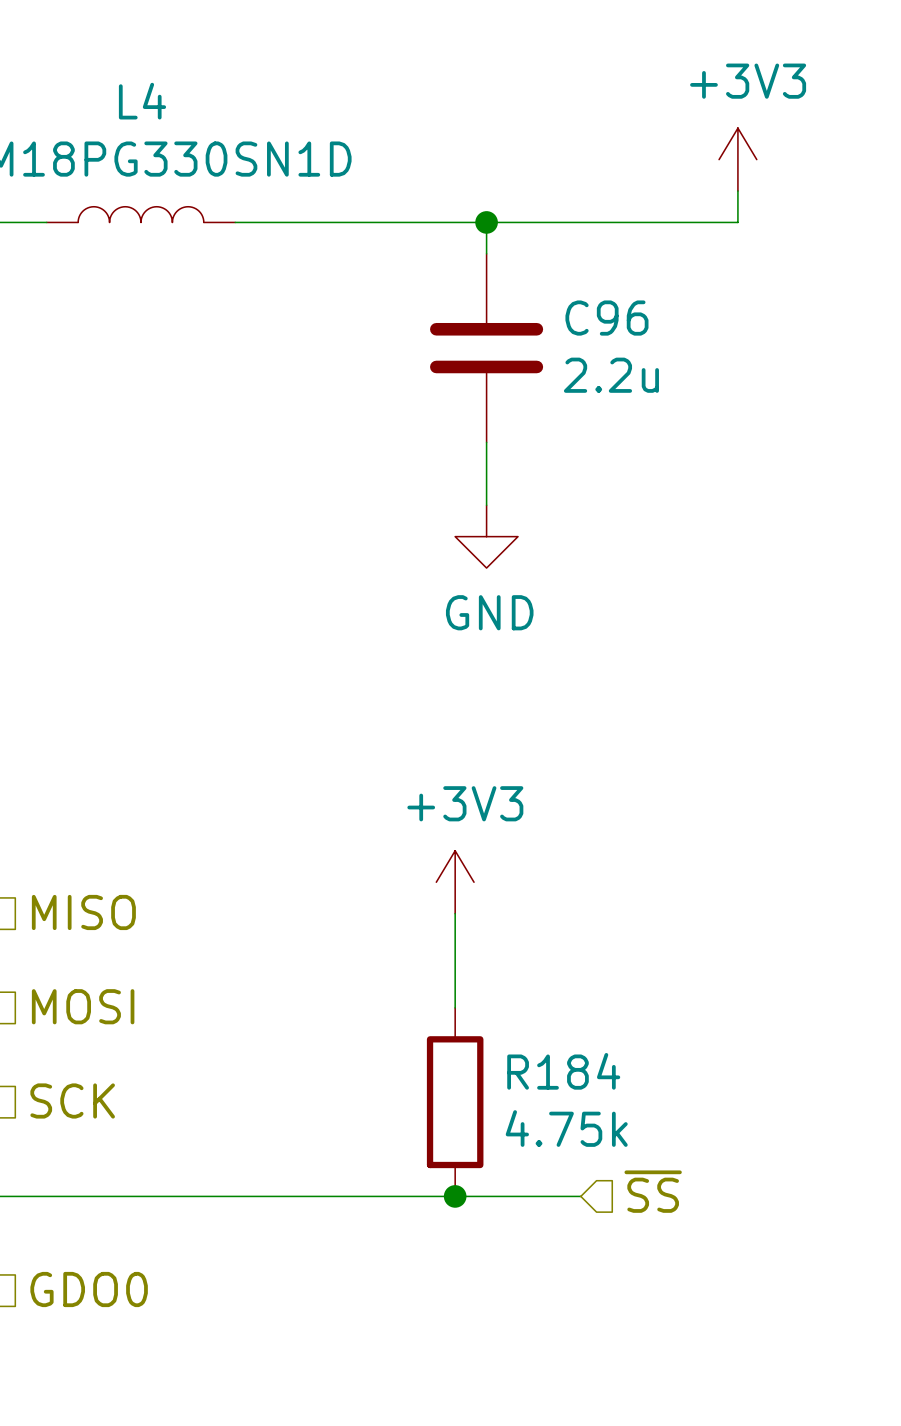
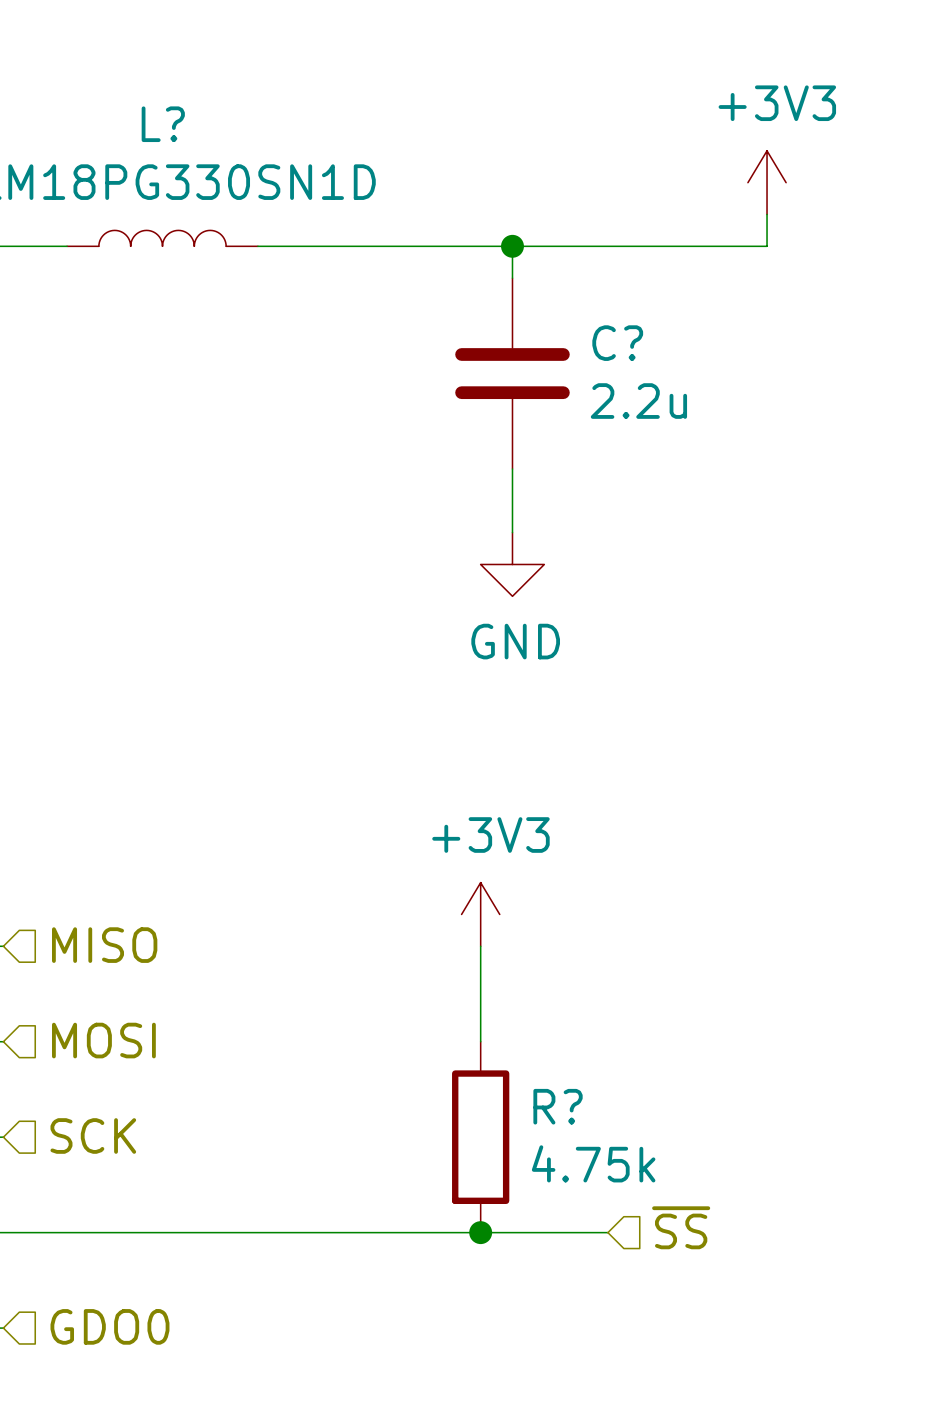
L4 name: L4 (142, 101) -> L? (163, 124)
C96 name: C96 (606, 318) -> C? (617, 343)
R184 name: R184 (563, 1071) -> R? (558, 1106)

